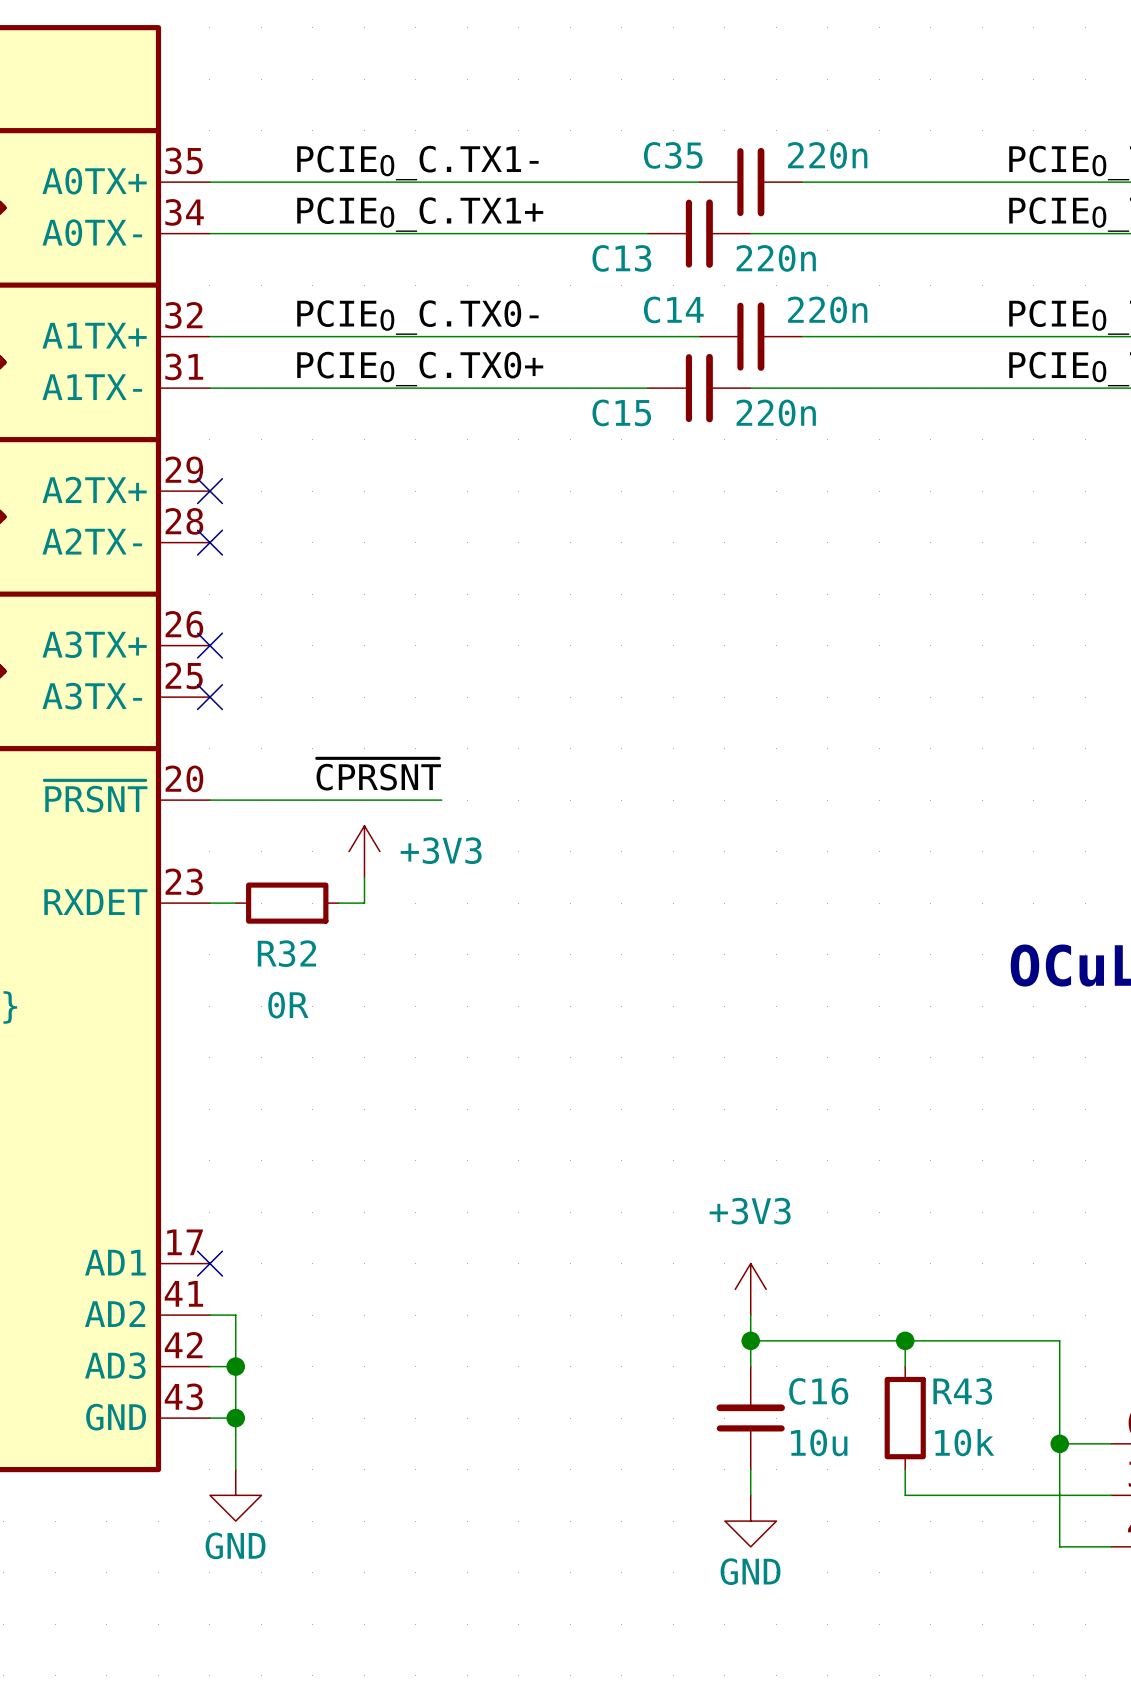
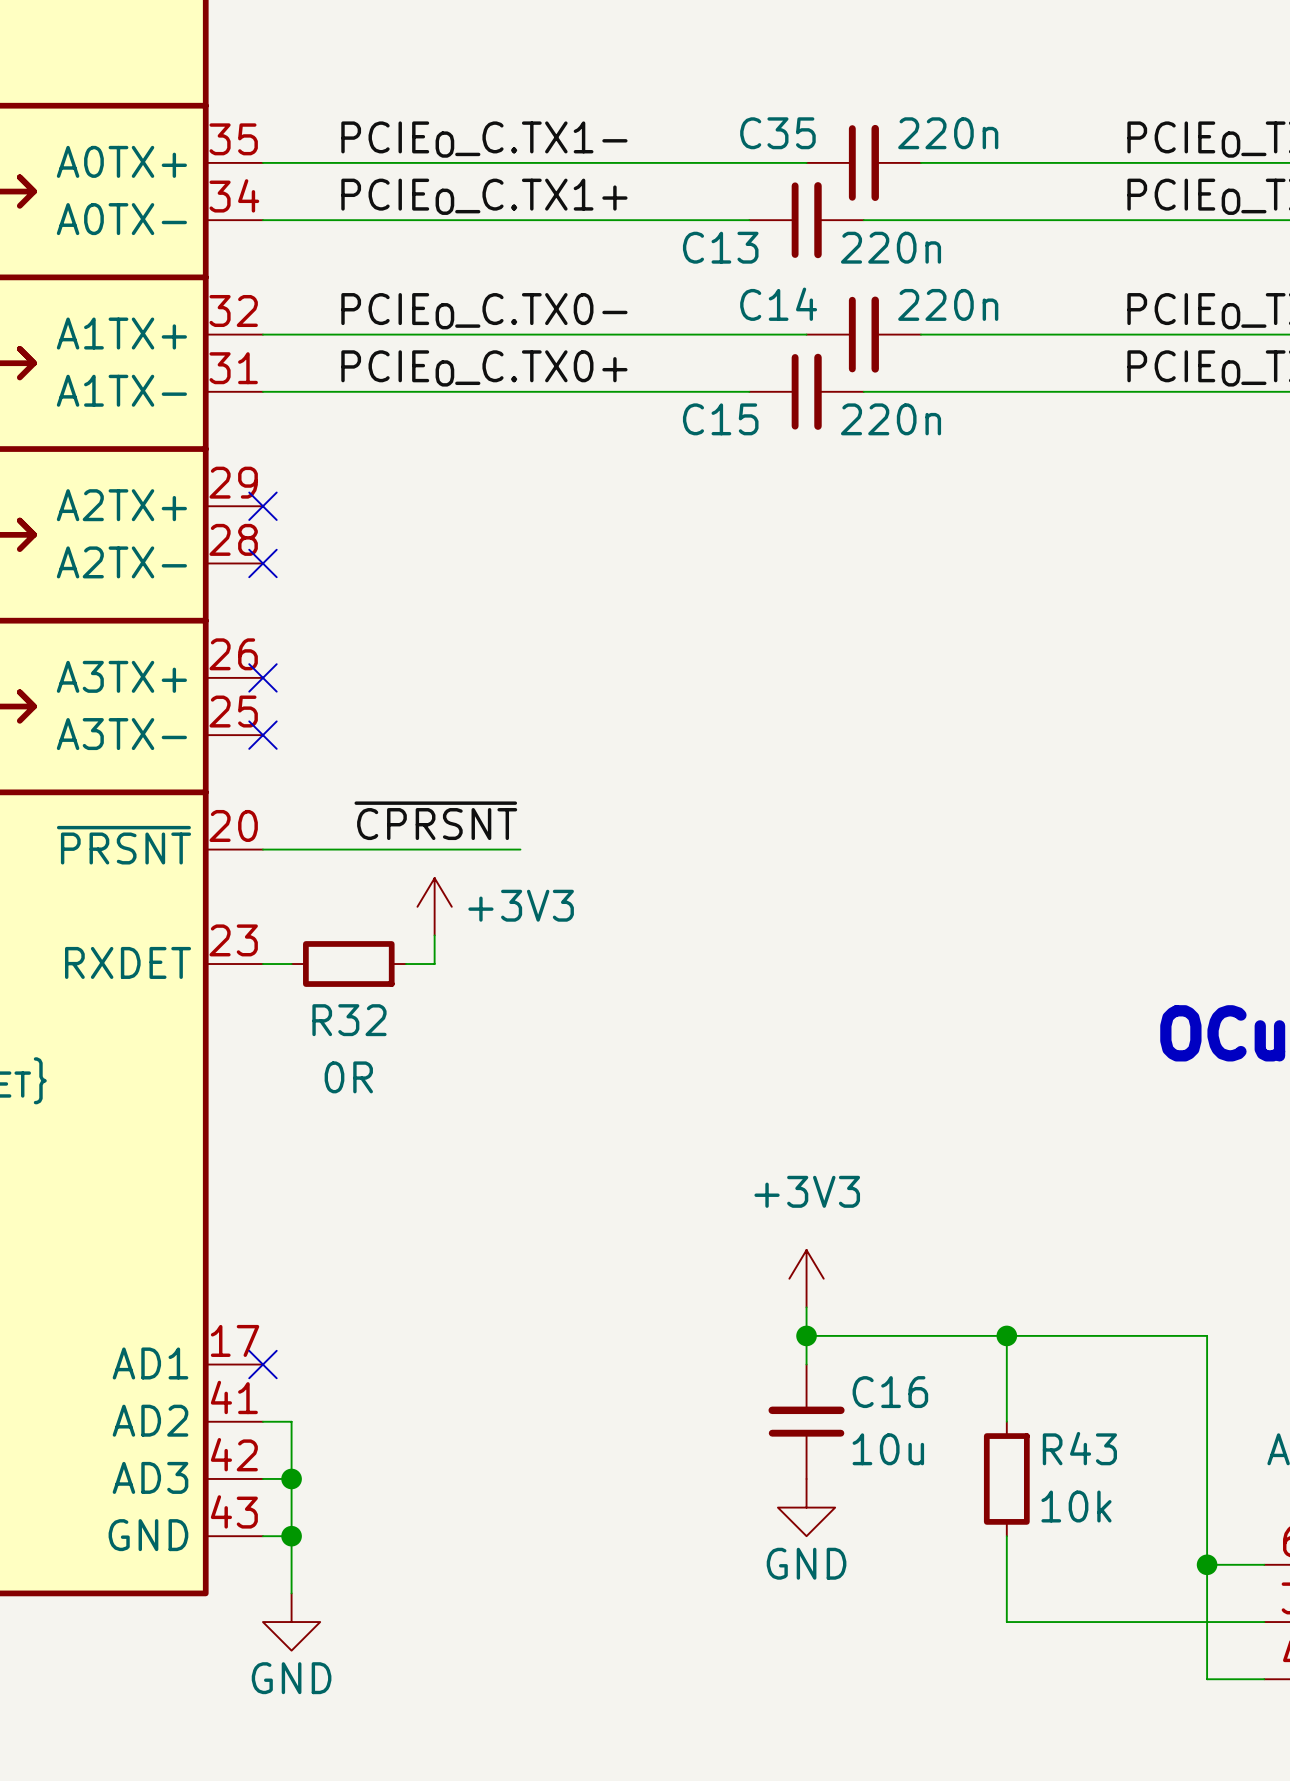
junction: none -> (806, 1335)
wire: none -> (1006, 1335) (1006, 1421)
junction: none -> (1006, 1335)
power symbol position: +3V3 (750, 1289) -> +3V3 (806, 1278)
wire: (750, 1315) (750, 1366) -> (806, 1307) (806, 1364)
wire: (750, 1340) (1059, 1340) -> (806, 1335) (1207, 1335) (1207, 1450)
junction: (750, 1340) -> none
wire: (905, 1340) (905, 1366) -> none
junction: (905, 1340) -> none
C16 position: (750, 1418) -> (806, 1421)
R43 position: (905, 1418) -> (1006, 1478)
wire: (750, 1469) (750, 1495) -> none
wire: (905, 1469) (905, 1495) -> (1006, 1536) (1006, 1622) (1035, 1622)
power symbol position: GND (750, 1521) -> GND (806, 1507)

